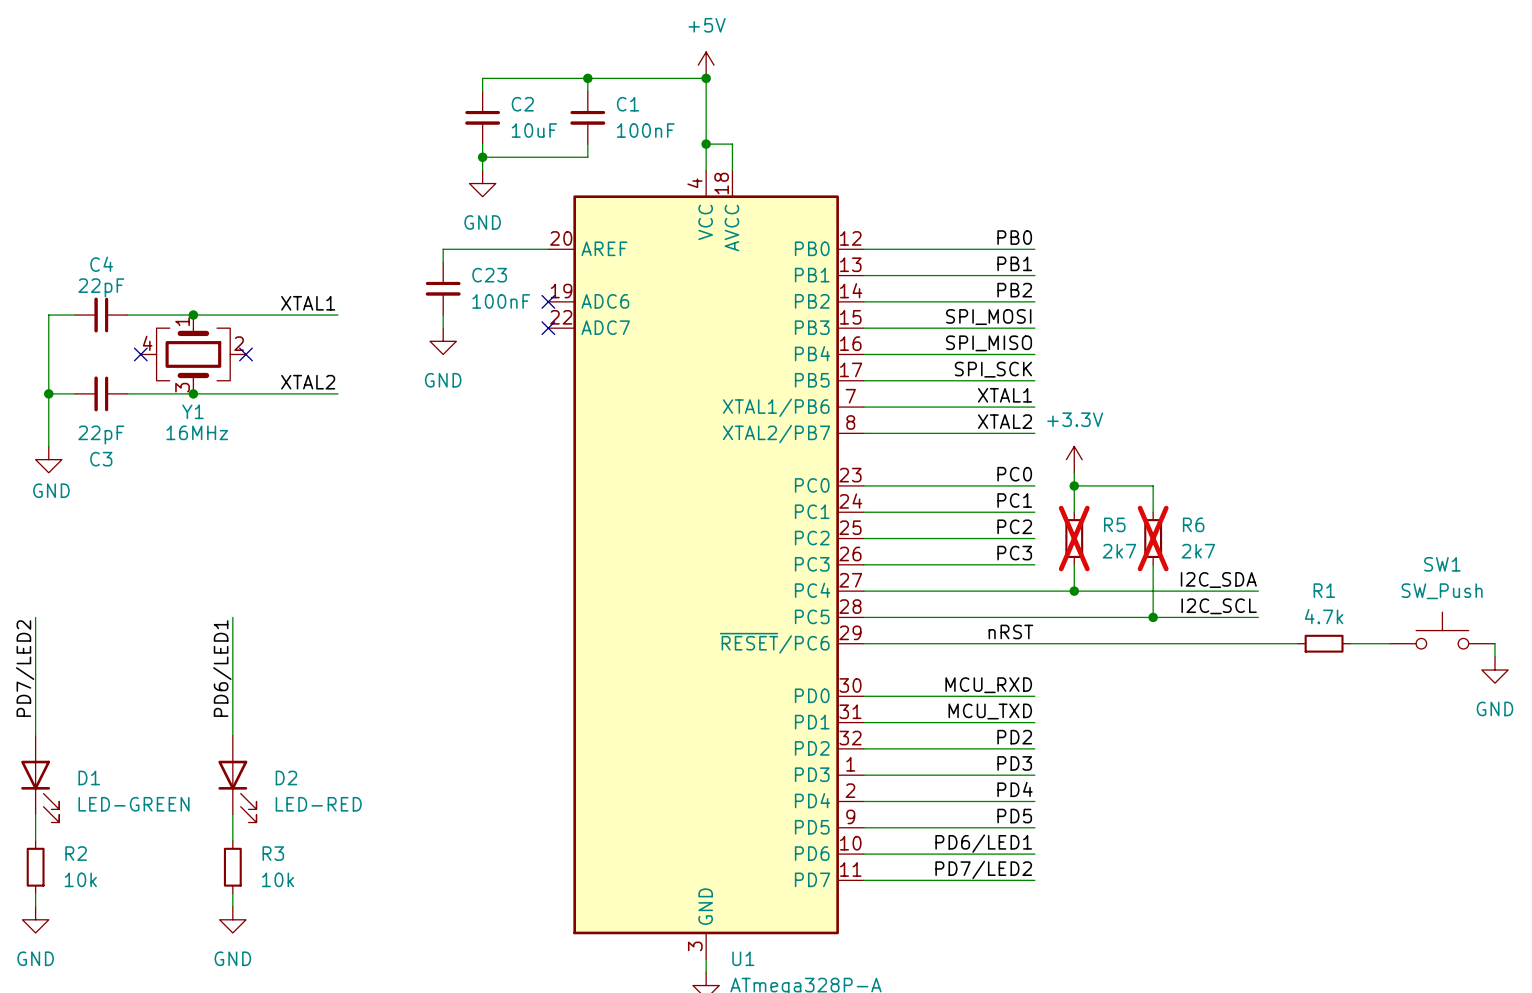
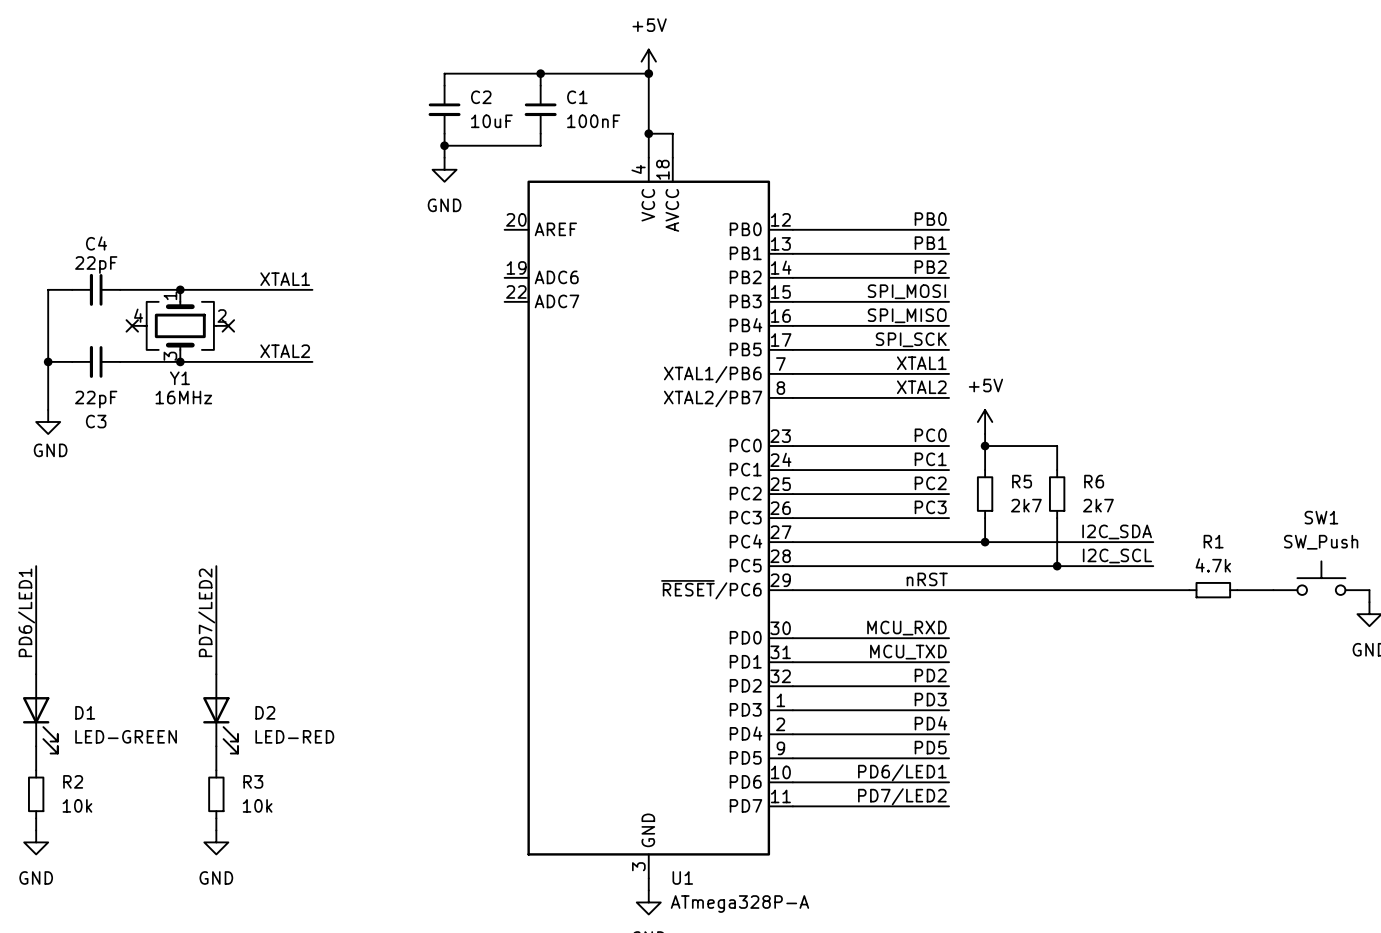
wire: (548, 249) (443, 249) (443, 262) -> none
C23: 100nF (443, 288) -> none
no-connect mark: (548, 301) -> none
wire: (443, 315) (443, 328) -> none
no-connect mark: (548, 328) -> none
power symbol: GND (443, 341) -> none
power symbol: +3.3V (1074, 459) -> +5V (985, 421)
R5 do-not-place cross: (1074, 538) -> none
R6 do-not-place cross: (1153, 538) -> none
label: PD7/LED2 (25, 668) -> PD6/LED1 (26, 612)
label: PD6/LED1 (222, 668) -> PD7/LED2 (206, 612)

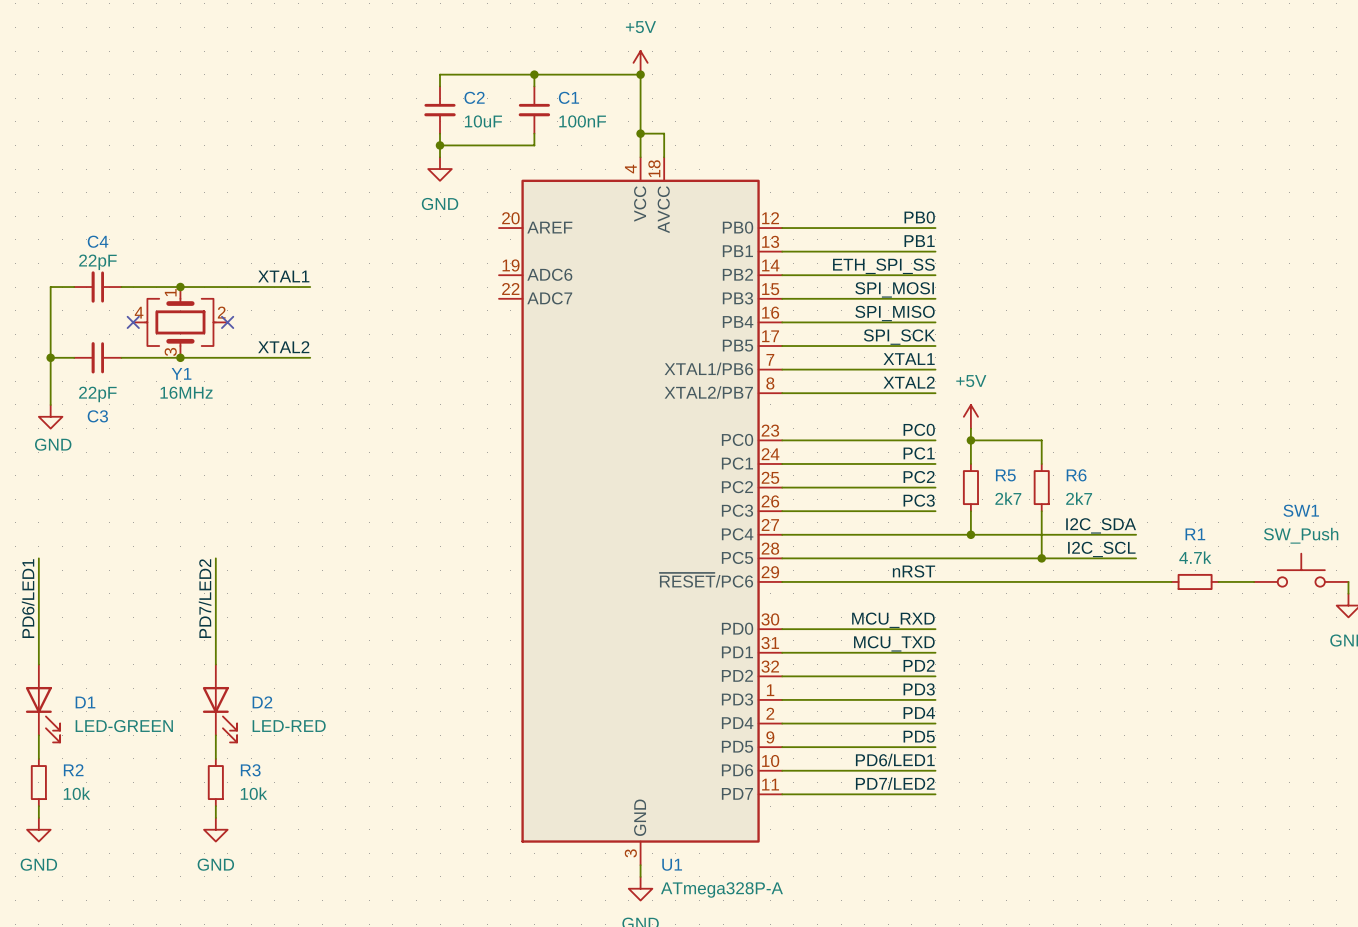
label: PB2 (930, 267) -> ETH_SPI_SS (883, 266)

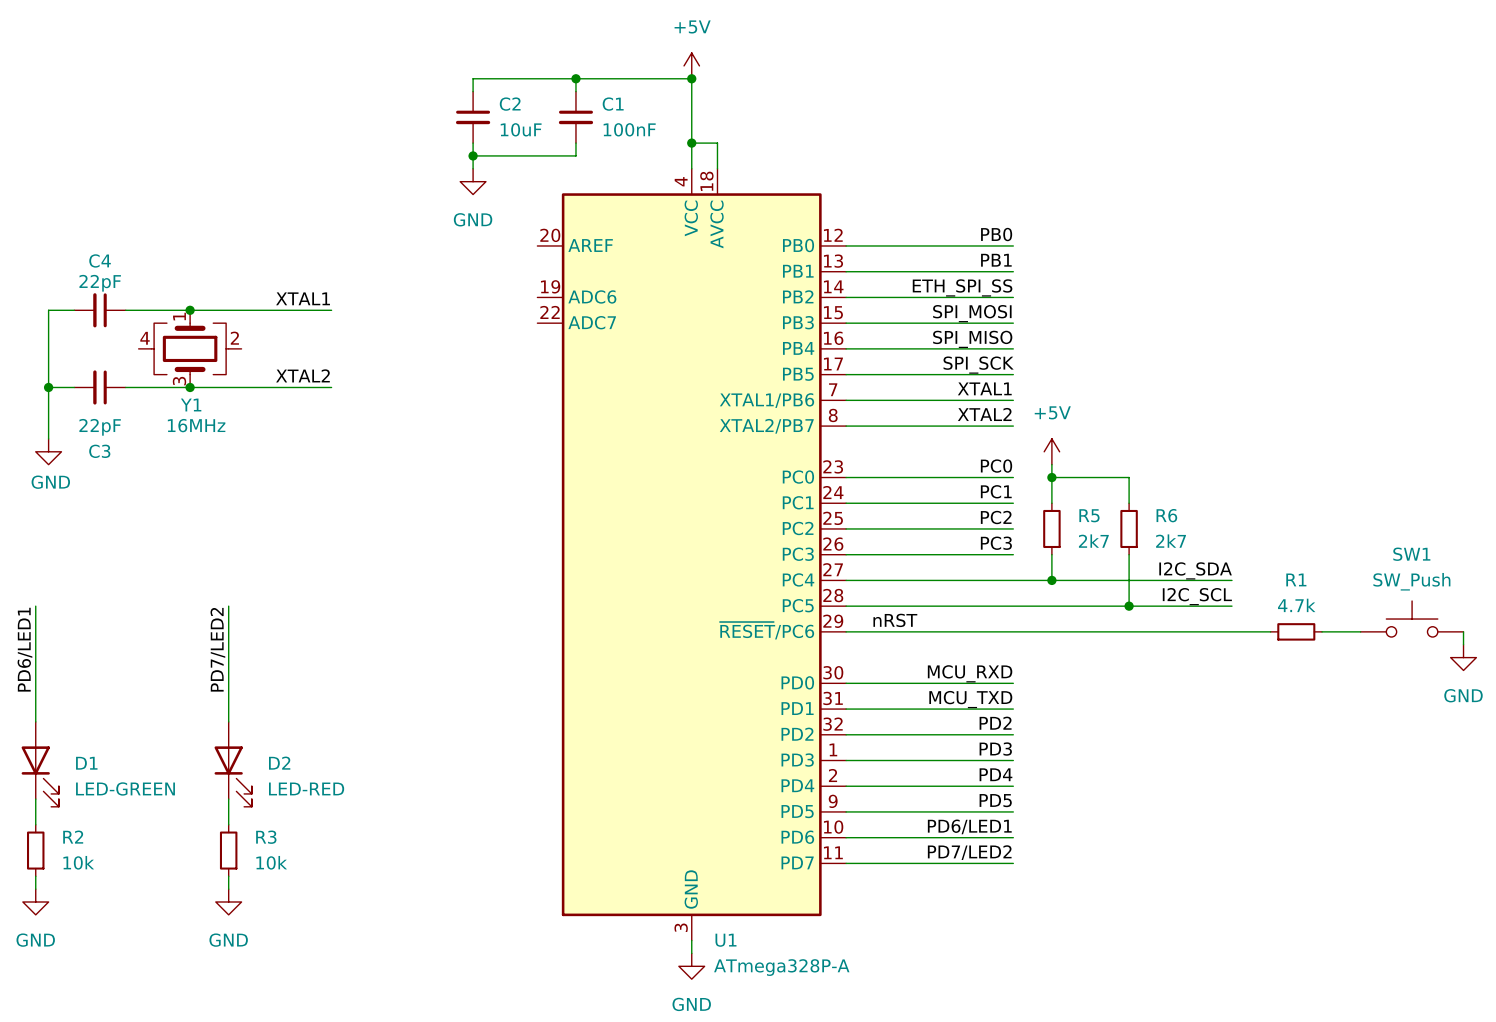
no-connect mark: (133, 322) -> none
no-connect mark: (227, 322) -> none
label position: nRST (913, 571) -> nRST (895, 620)

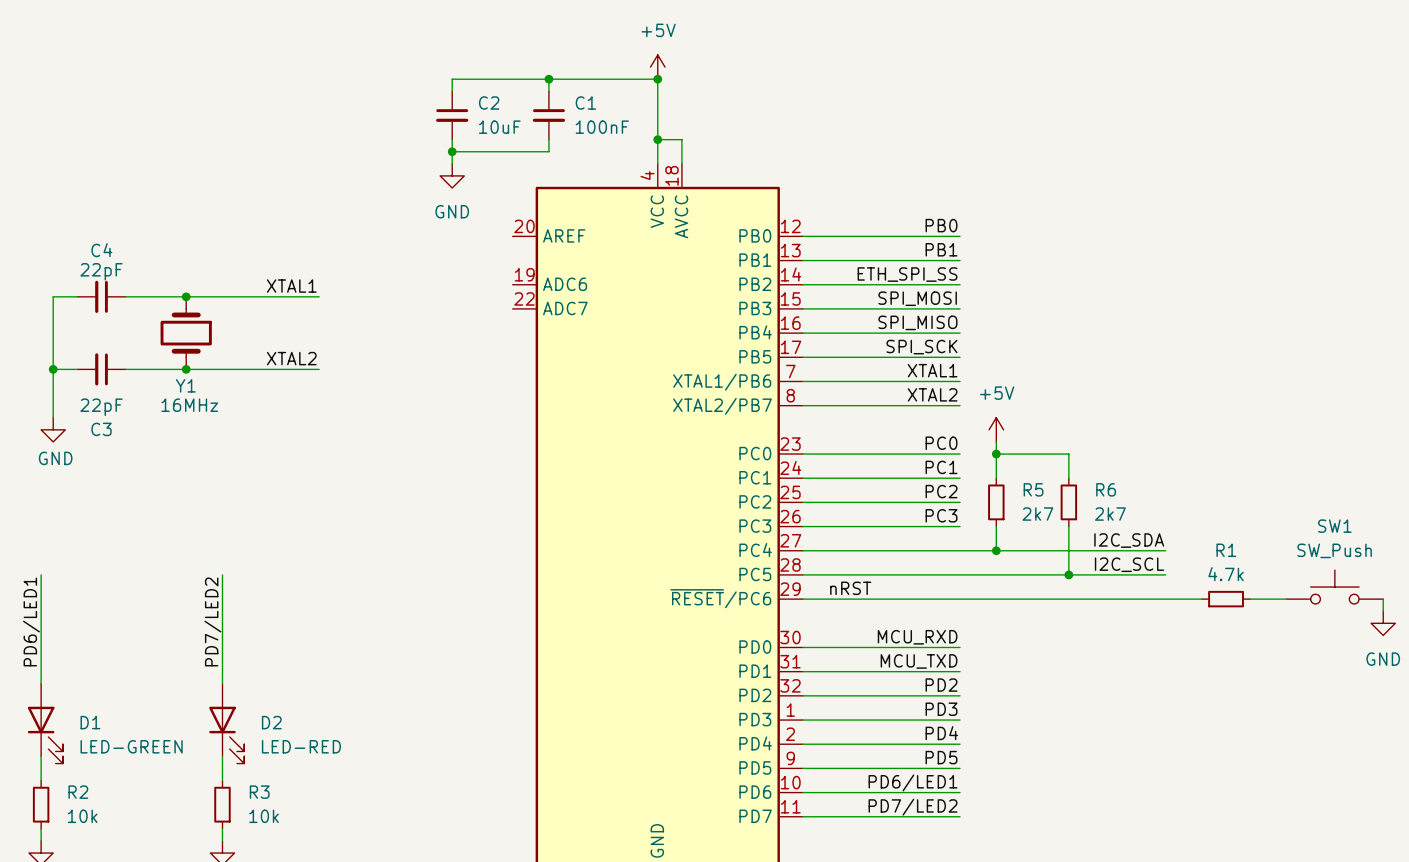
Y1 symbol: [138, 310, 242, 388] -> [160, 296, 212, 370]

